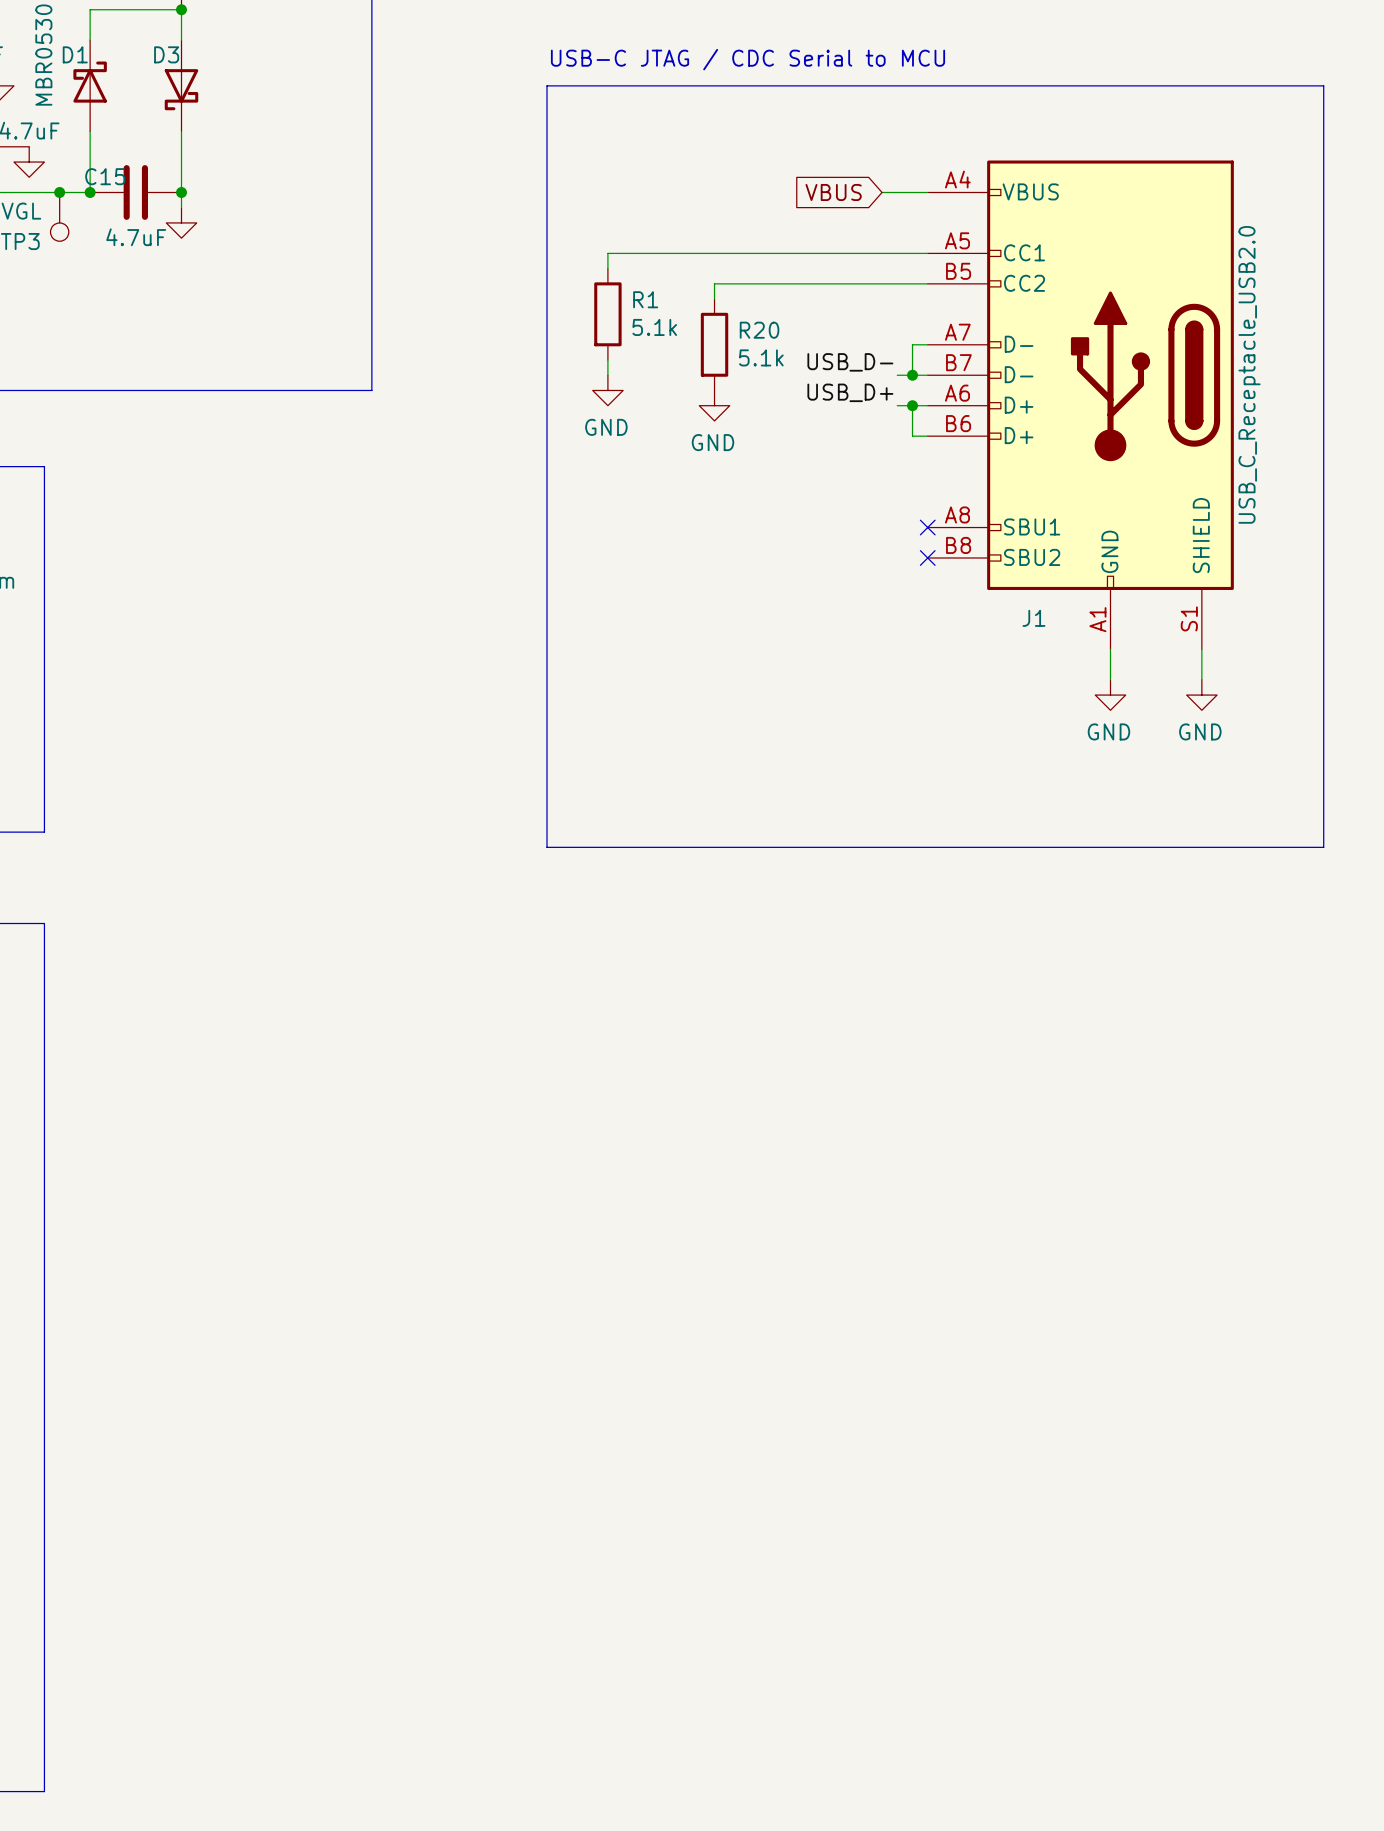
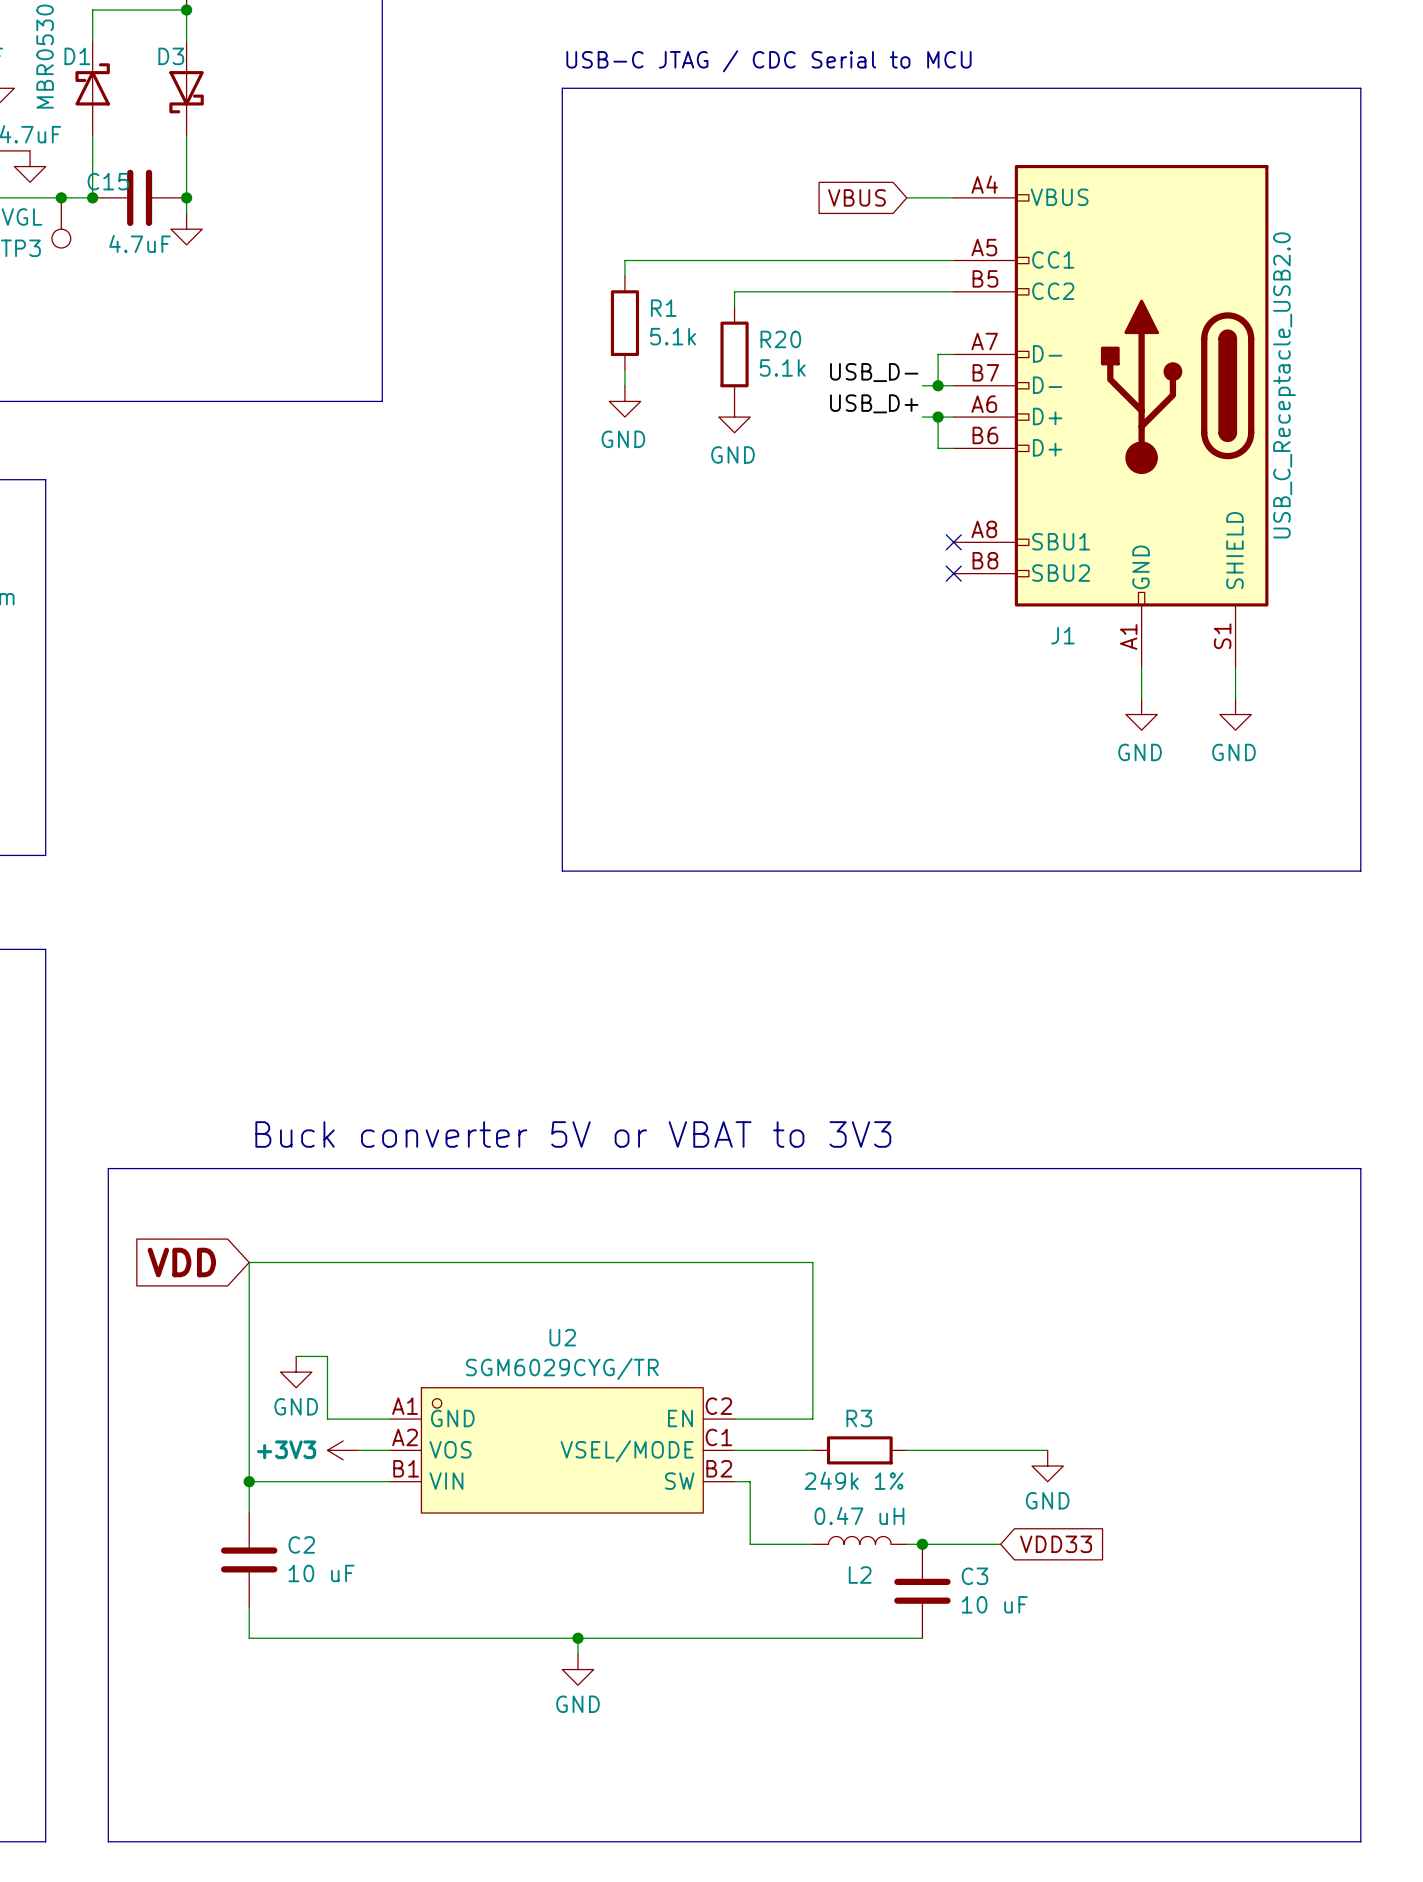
text: none -> Buck converter 5V or VBAT to 3V3 (573, 1134)
line: none -> (108, 1168) (1360, 1168) (1360, 1841) (108, 1841) (108, 1168)
global label: none -> VDD (181, 1262)
wire: none -> (296, 1356) (327, 1356) (327, 1419) (390, 1419)
power symbol: none -> GND (296, 1372)
wire: none -> (734, 1419) (812, 1419) (812, 1262) (249, 1262) (249, 1513)
power symbol: none -> +3V3 (343, 1450)
wire: none -> (358, 1450) (390, 1450)
U2: none -> SGM6029CYG/TR (562, 1450)
wire: none -> (734, 1450) (812, 1450)
R3: none -> 249k 1% (859, 1450)
wire: none -> (906, 1450) (1047, 1450)
power symbol: none -> GND (1047, 1466)
wire: none -> (249, 1481) (390, 1481)
junction: none -> (249, 1481)
wire: none -> (734, 1481) (750, 1481) (750, 1544) (812, 1544)
L2: none -> 0.47 uH (859, 1540)
wire: none -> (906, 1544) (1000, 1544)
junction: none -> (922, 1544)
global label: none -> VDD33 (1056, 1544)
C2: none -> 10 uF (249, 1559)
C3: none -> 10 uF (922, 1591)
wire: none -> (249, 1606) (249, 1638) (922, 1638)
wire: none -> (577, 1638) (577, 1653)
junction: none -> (577, 1638)
power symbol: none -> GND (577, 1669)

